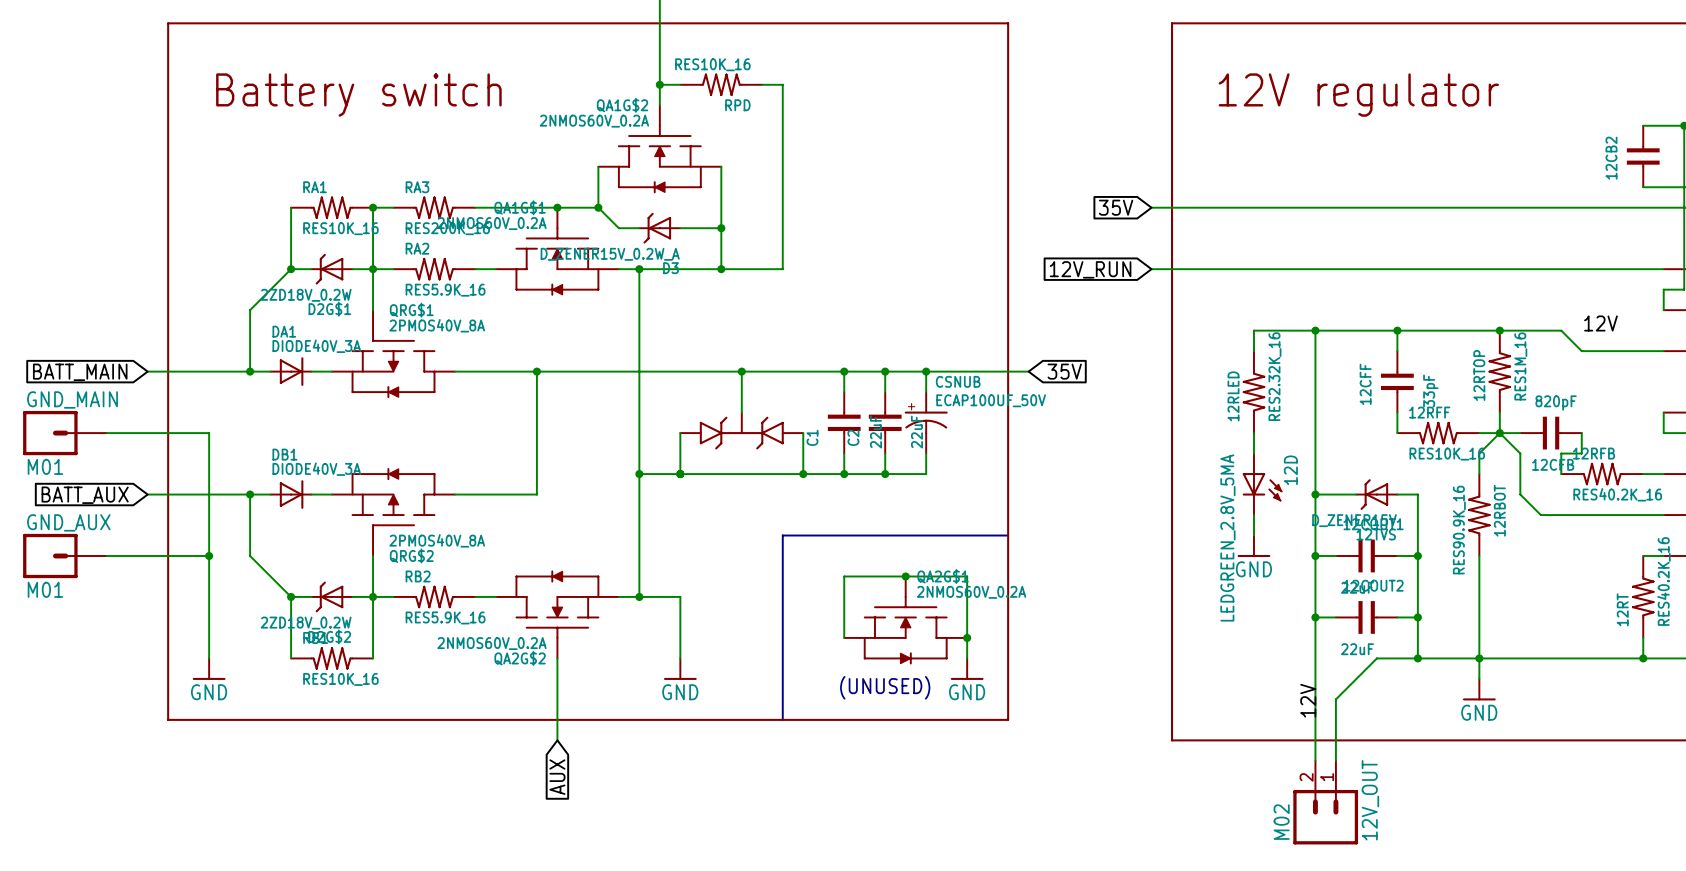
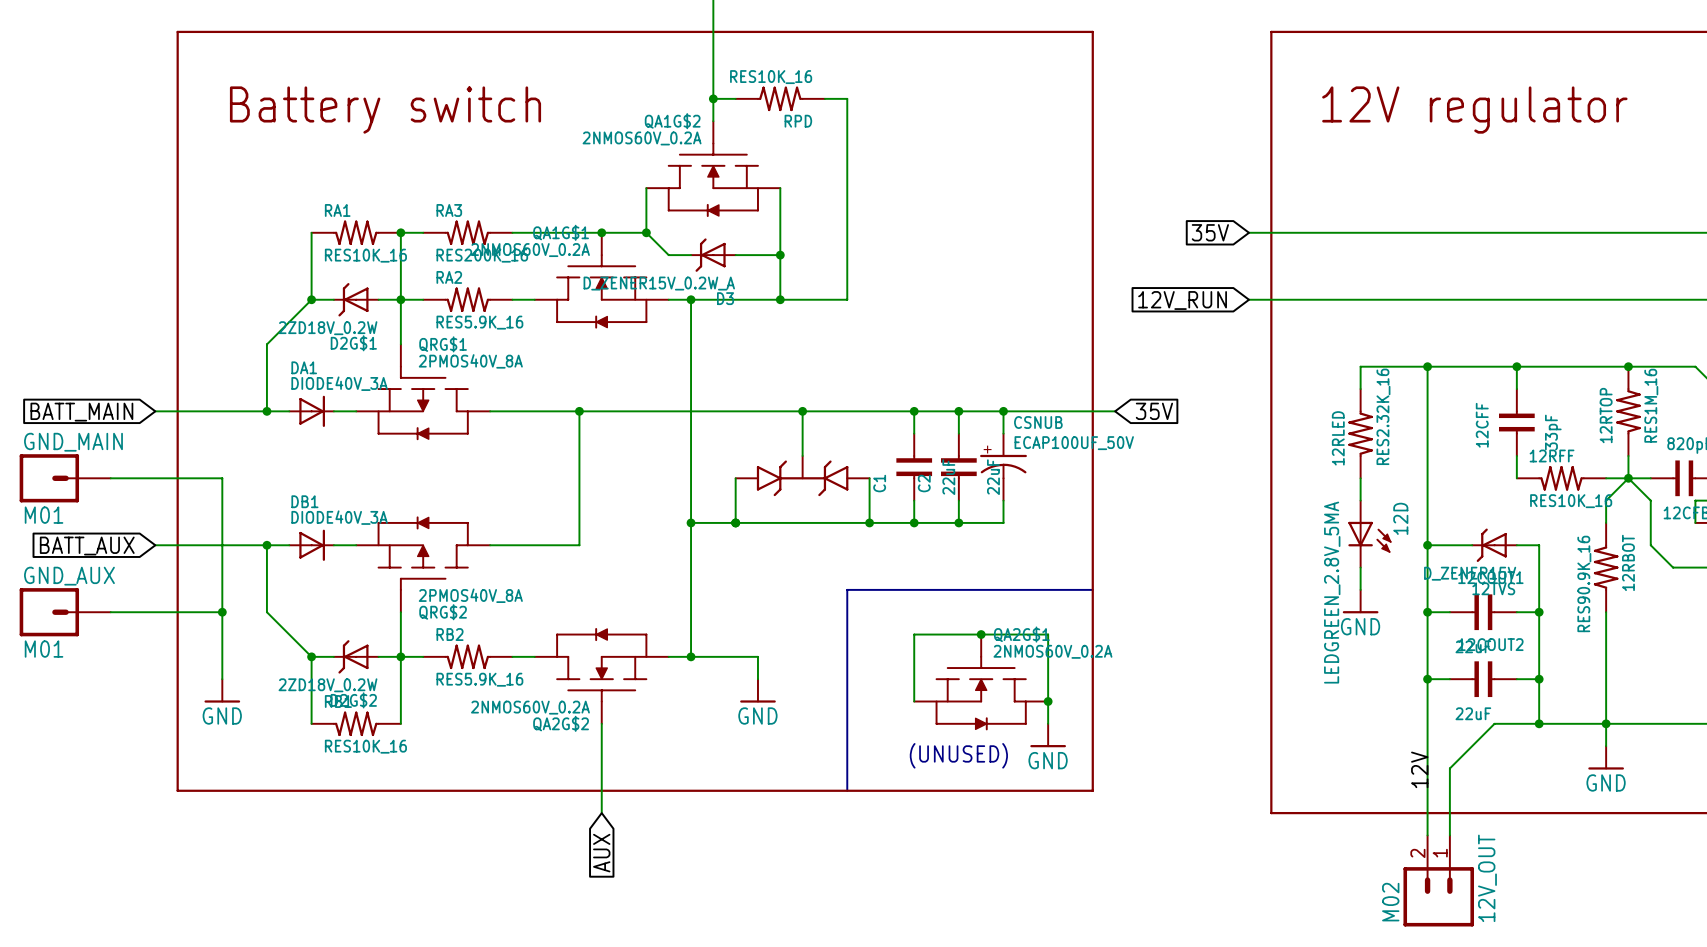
wire: (680, 596) (680, 658) -> (735, 656) (757, 656) (757, 679)
power symbol position: GND (209, 669) -> GND (222, 690)
power symbol position: GND (680, 669) -> GND (757, 690)

